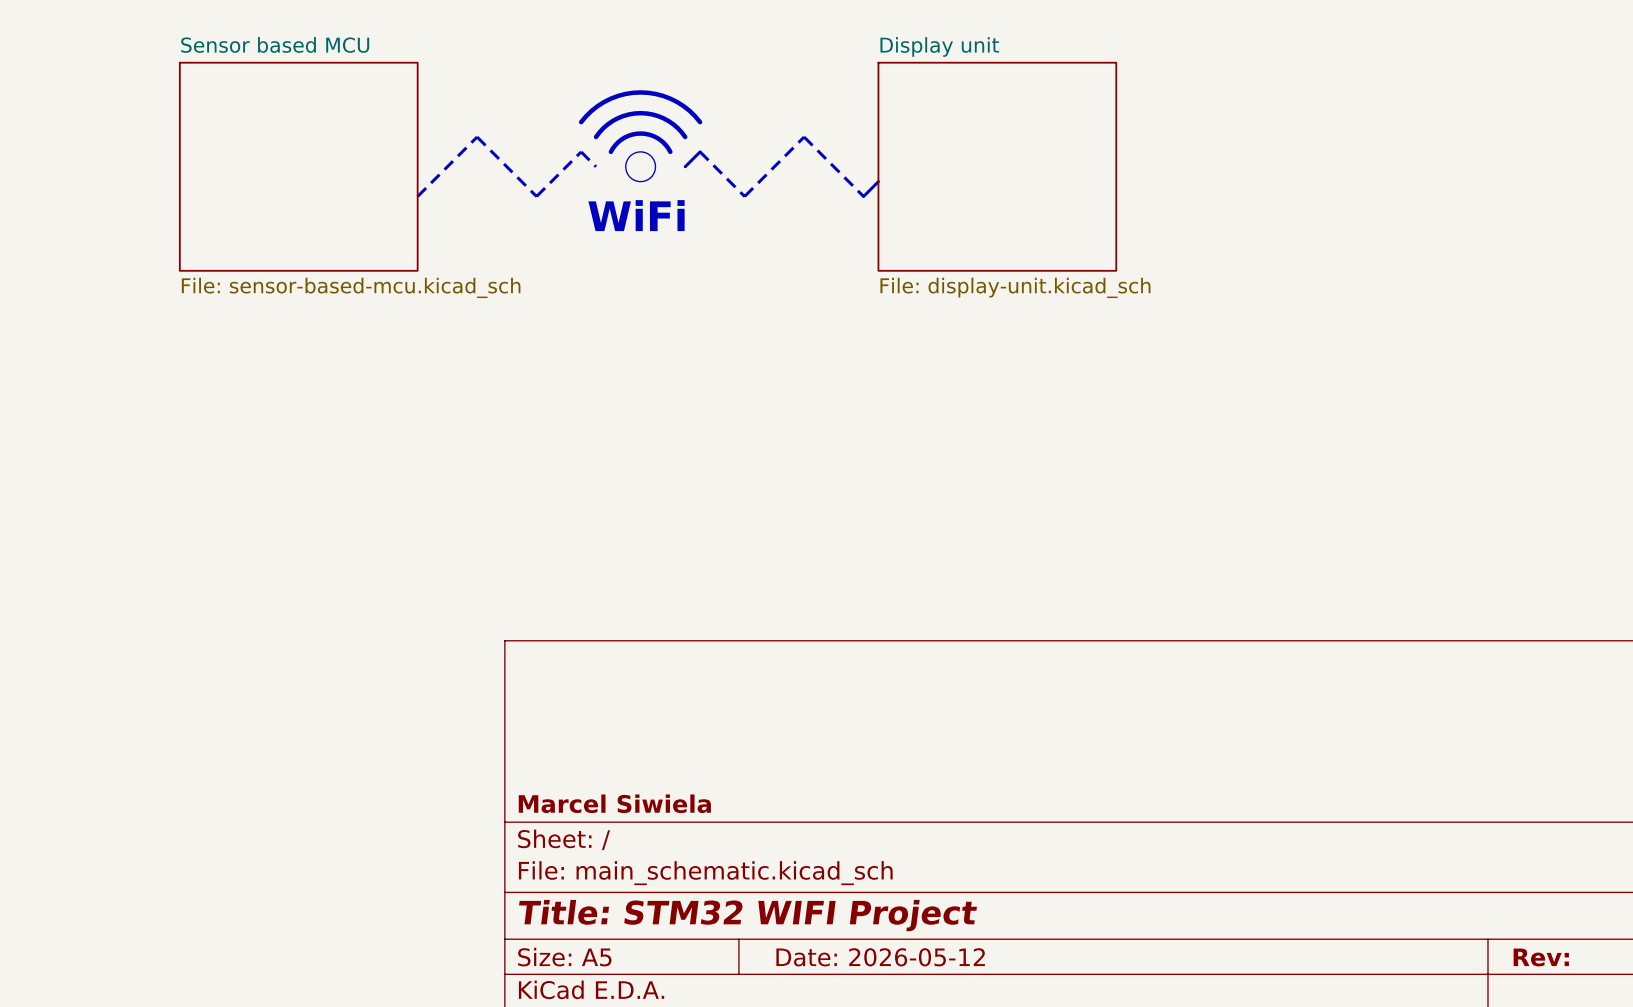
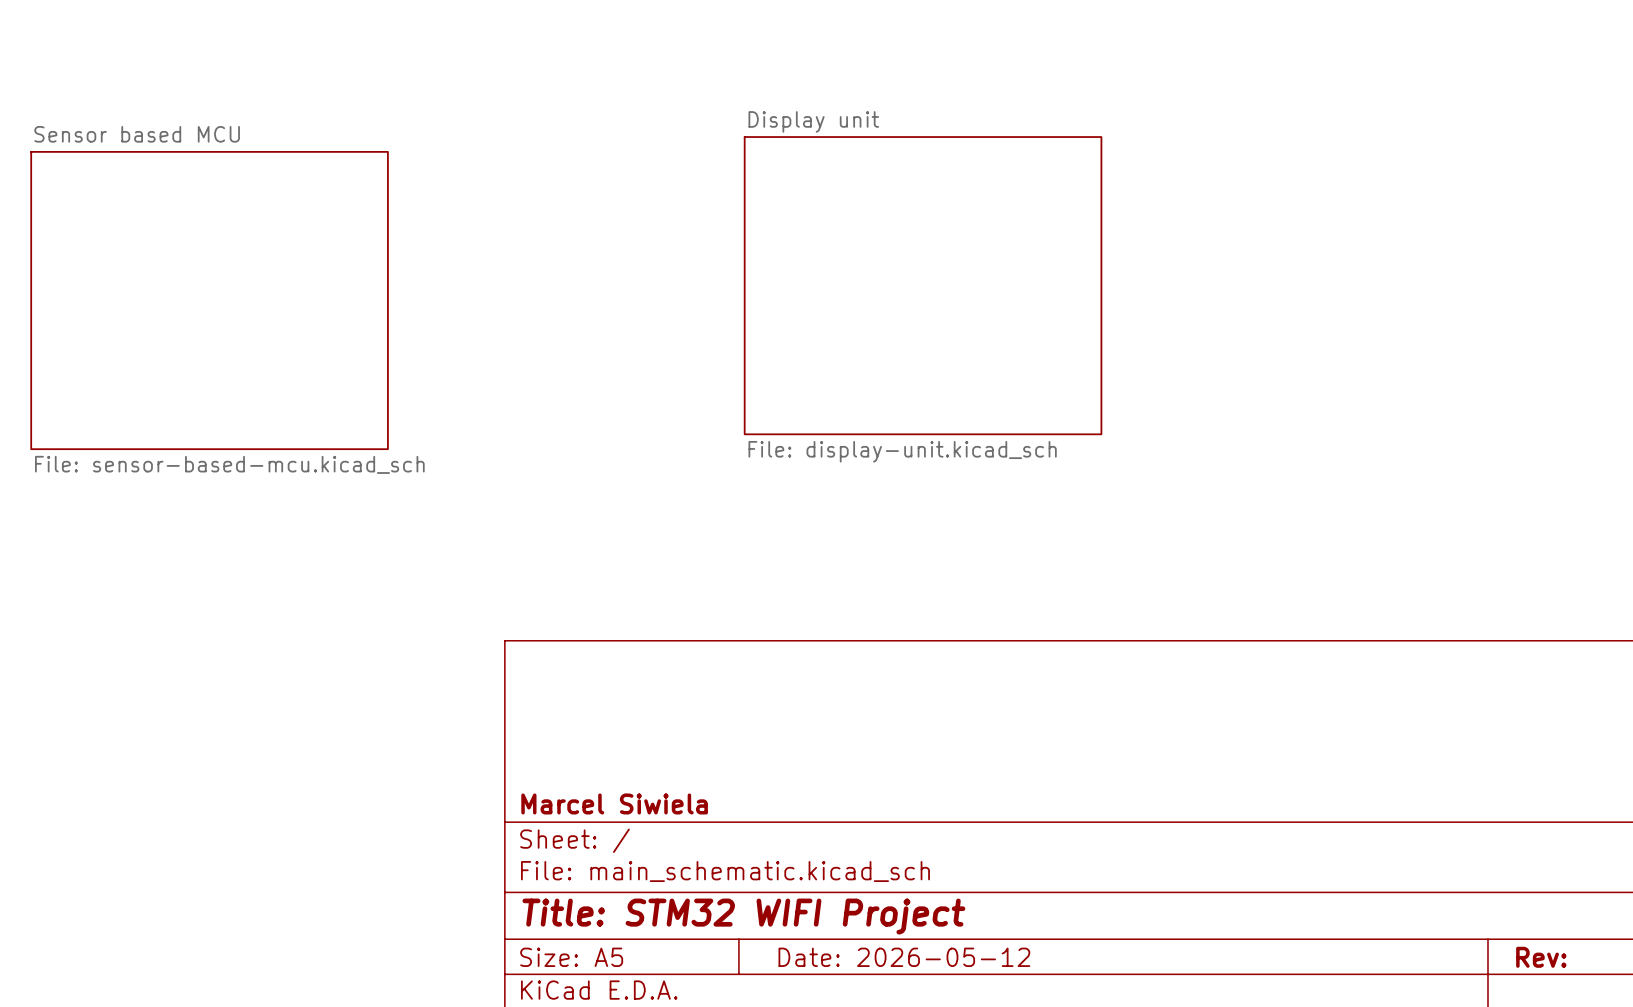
line: (581, 122) (597, 106) (610, 98) (625, 94) (640, 92) (655, 94) (677, 102) (689, 110) (700, 122) -> none
line: (596, 137) (612, 120) (623, 116) (640, 113) (663, 118) (677, 128) (685, 137) -> none
line: (610, 151) (624, 137) (640, 133) (656, 137) (670, 151) -> none
drawing: [625, 151, 656, 182] -> none
sheet Sensor based MCU: File: sensor-based-mcu.kicad_sch (298, 166) -> none
line: (596, 166) (581, 151) (536, 196) (477, 137) (417, 196) -> none
line: (685, 166) (700, 151) (744, 196) (804, 137) (863, 196) (878, 181) -> none
sheet Display unit: File: display-unit.kicad_sch (997, 166) -> none
text: WiFi (636, 215) -> none
sheet Display unit: none -> File: display-unit.kicad_sch (923, 285)
sheet Sensor based MCU: none -> File: sensor-based-mcu.kicad_sch (209, 300)

